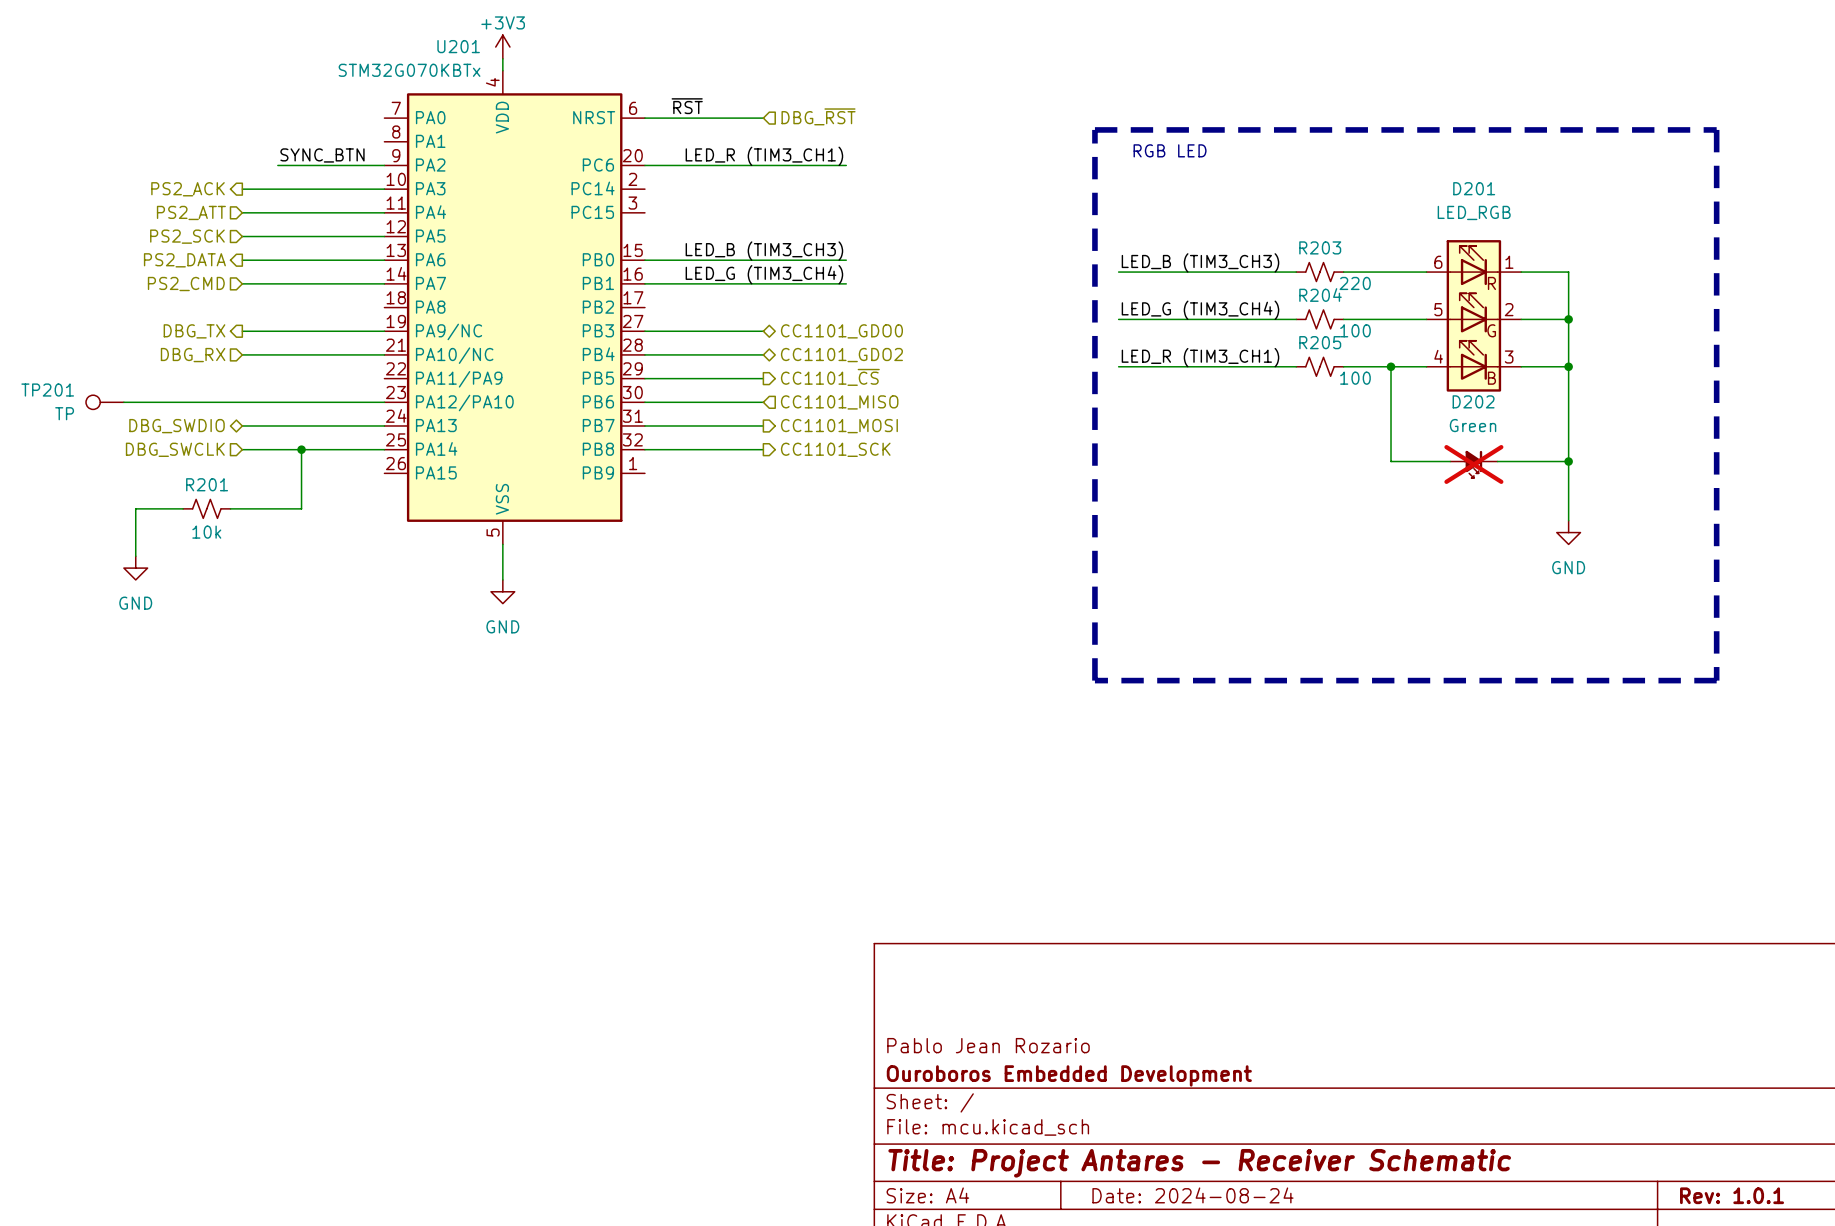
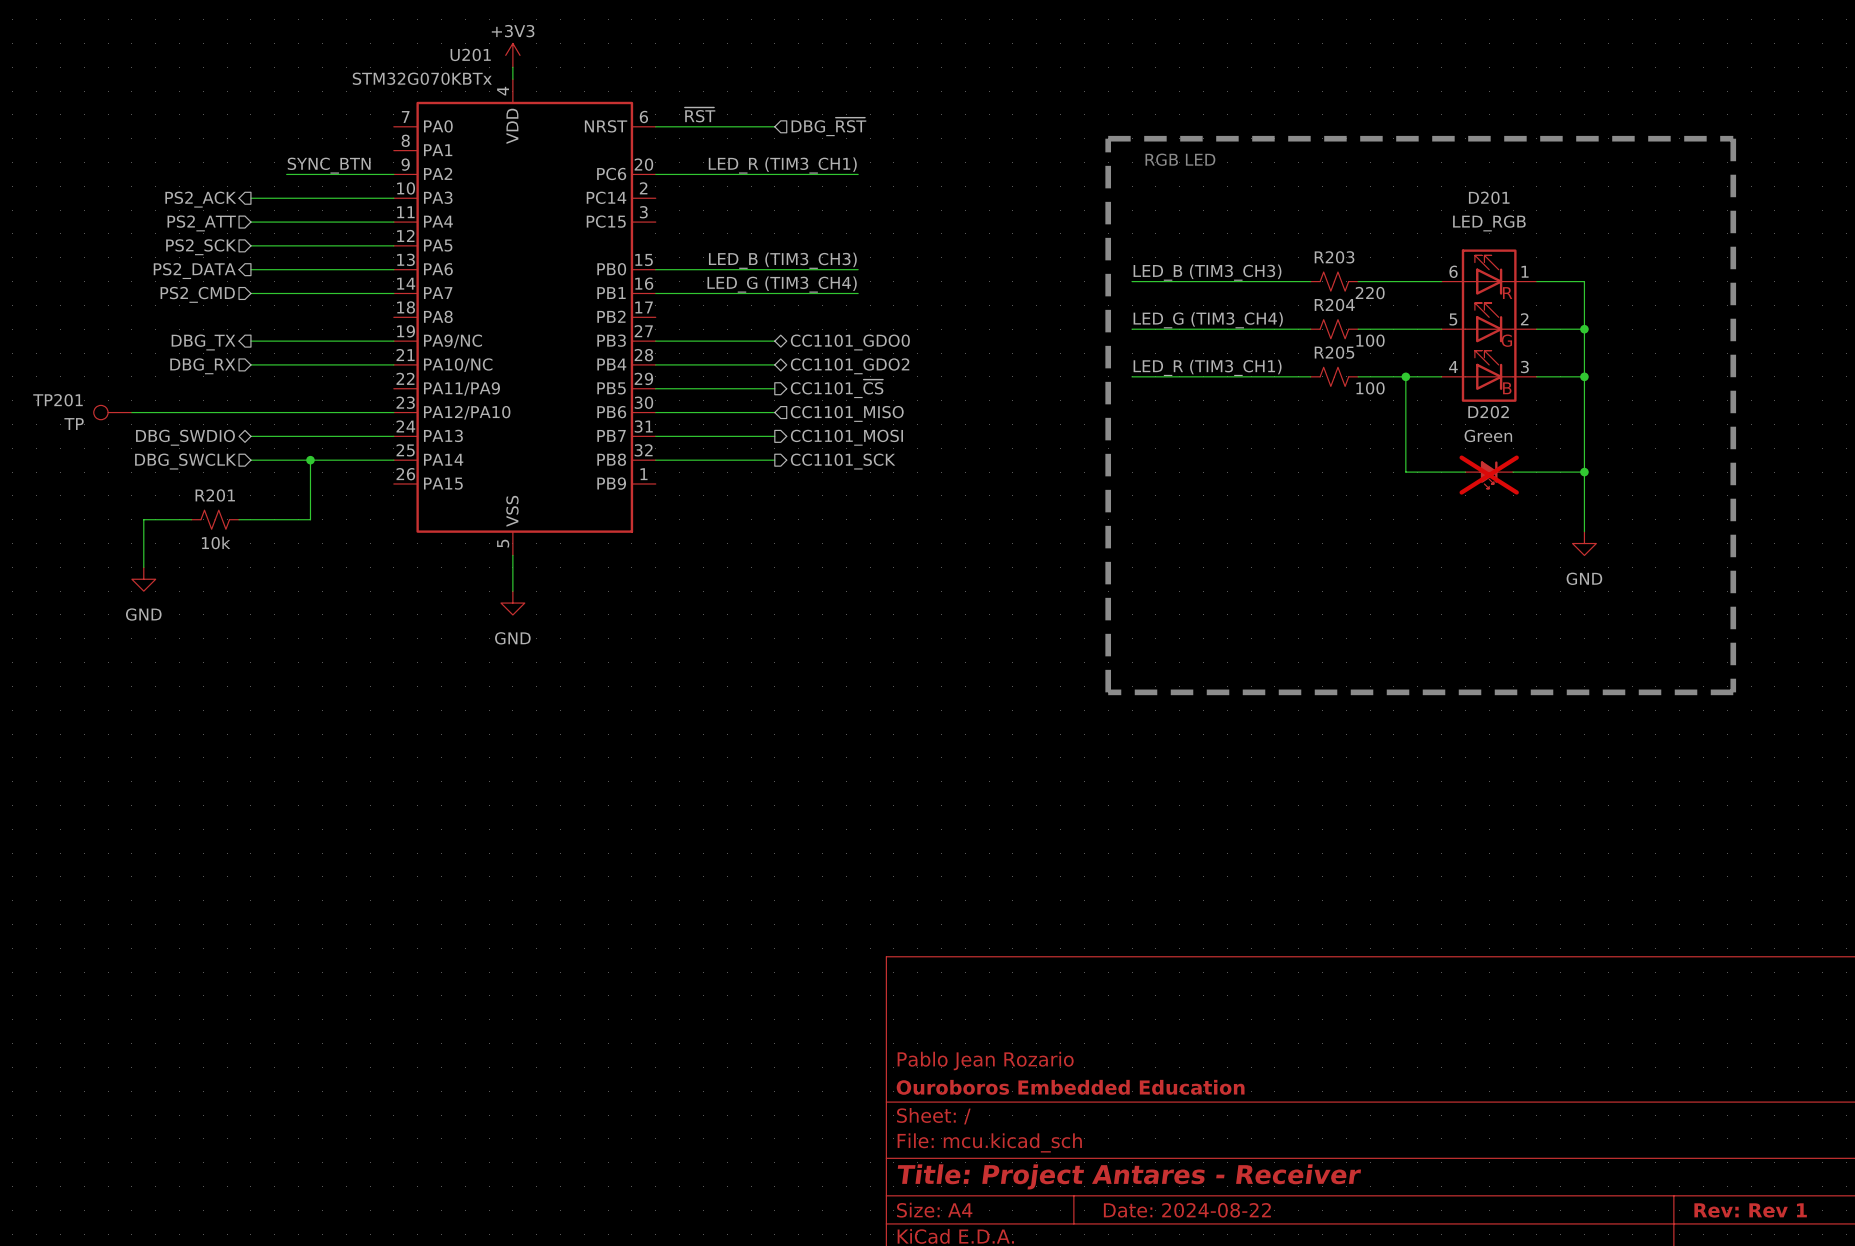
title block: Ouroboros Embedded Development (1069, 1075) -> Ouroboros Embedded Education (1070, 1087)
title block: Title: Project Antares - Receiver Schematic (1199, 1163) -> Title: Project Antares - Receiver (1129, 1176)
title block: Date: 2024-08-24 (1192, 1195) -> Date: 2024-08-22 (1187, 1210)
title block: Rev: 1.0.1 (1732, 1195) -> Rev: Rev 1 (1750, 1210)

